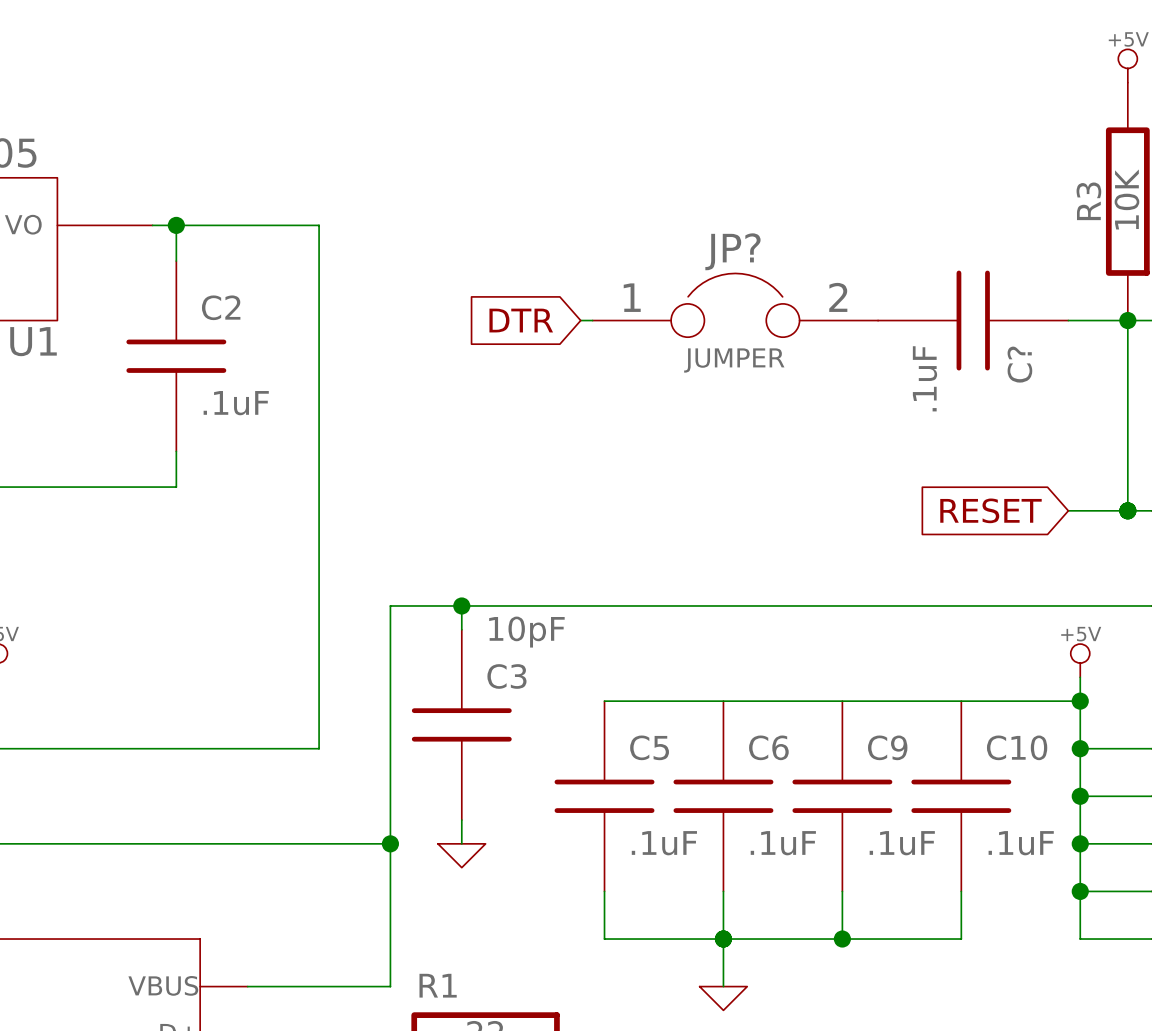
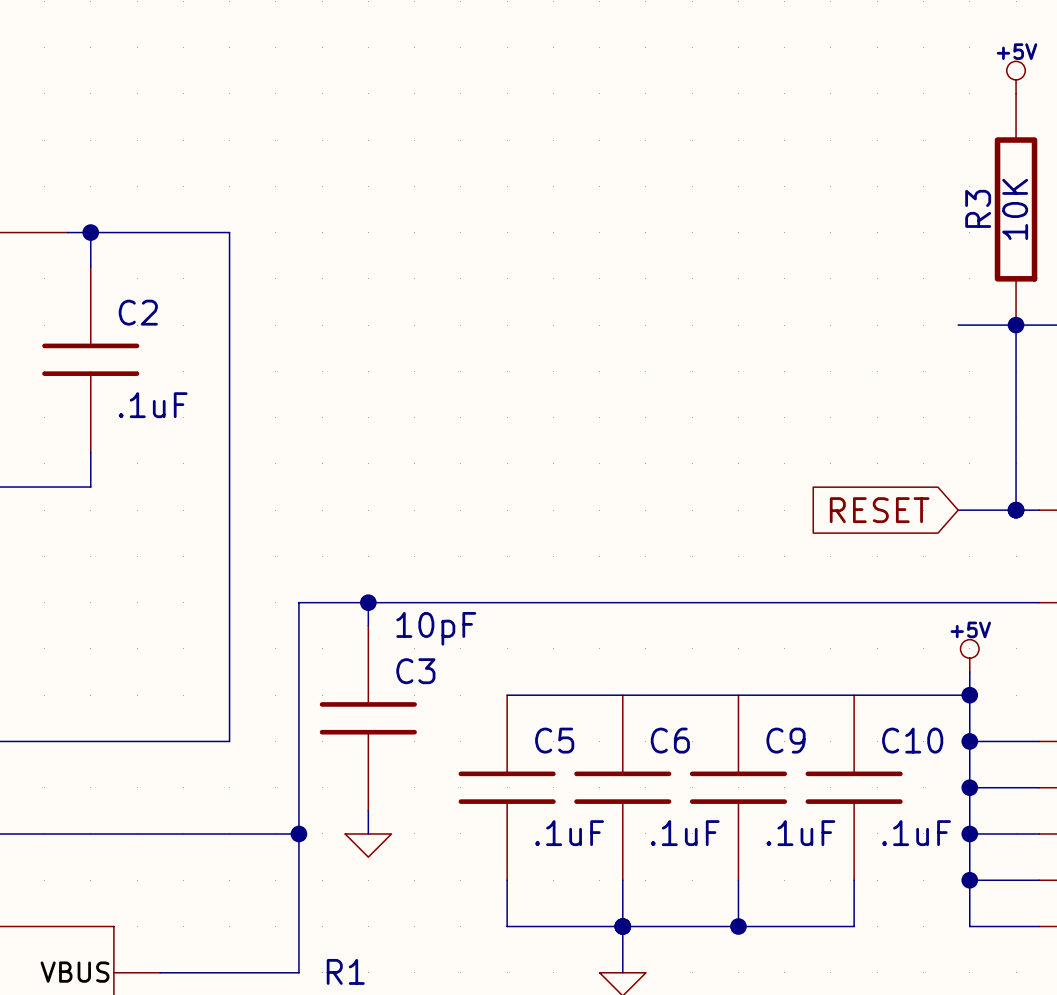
JP?: JUMPER (735, 305) -> none
global label: DTR (521, 320) -> none
wire: (580, 320) (592, 320) -> none
C?: .1uF (973, 320) -> none

